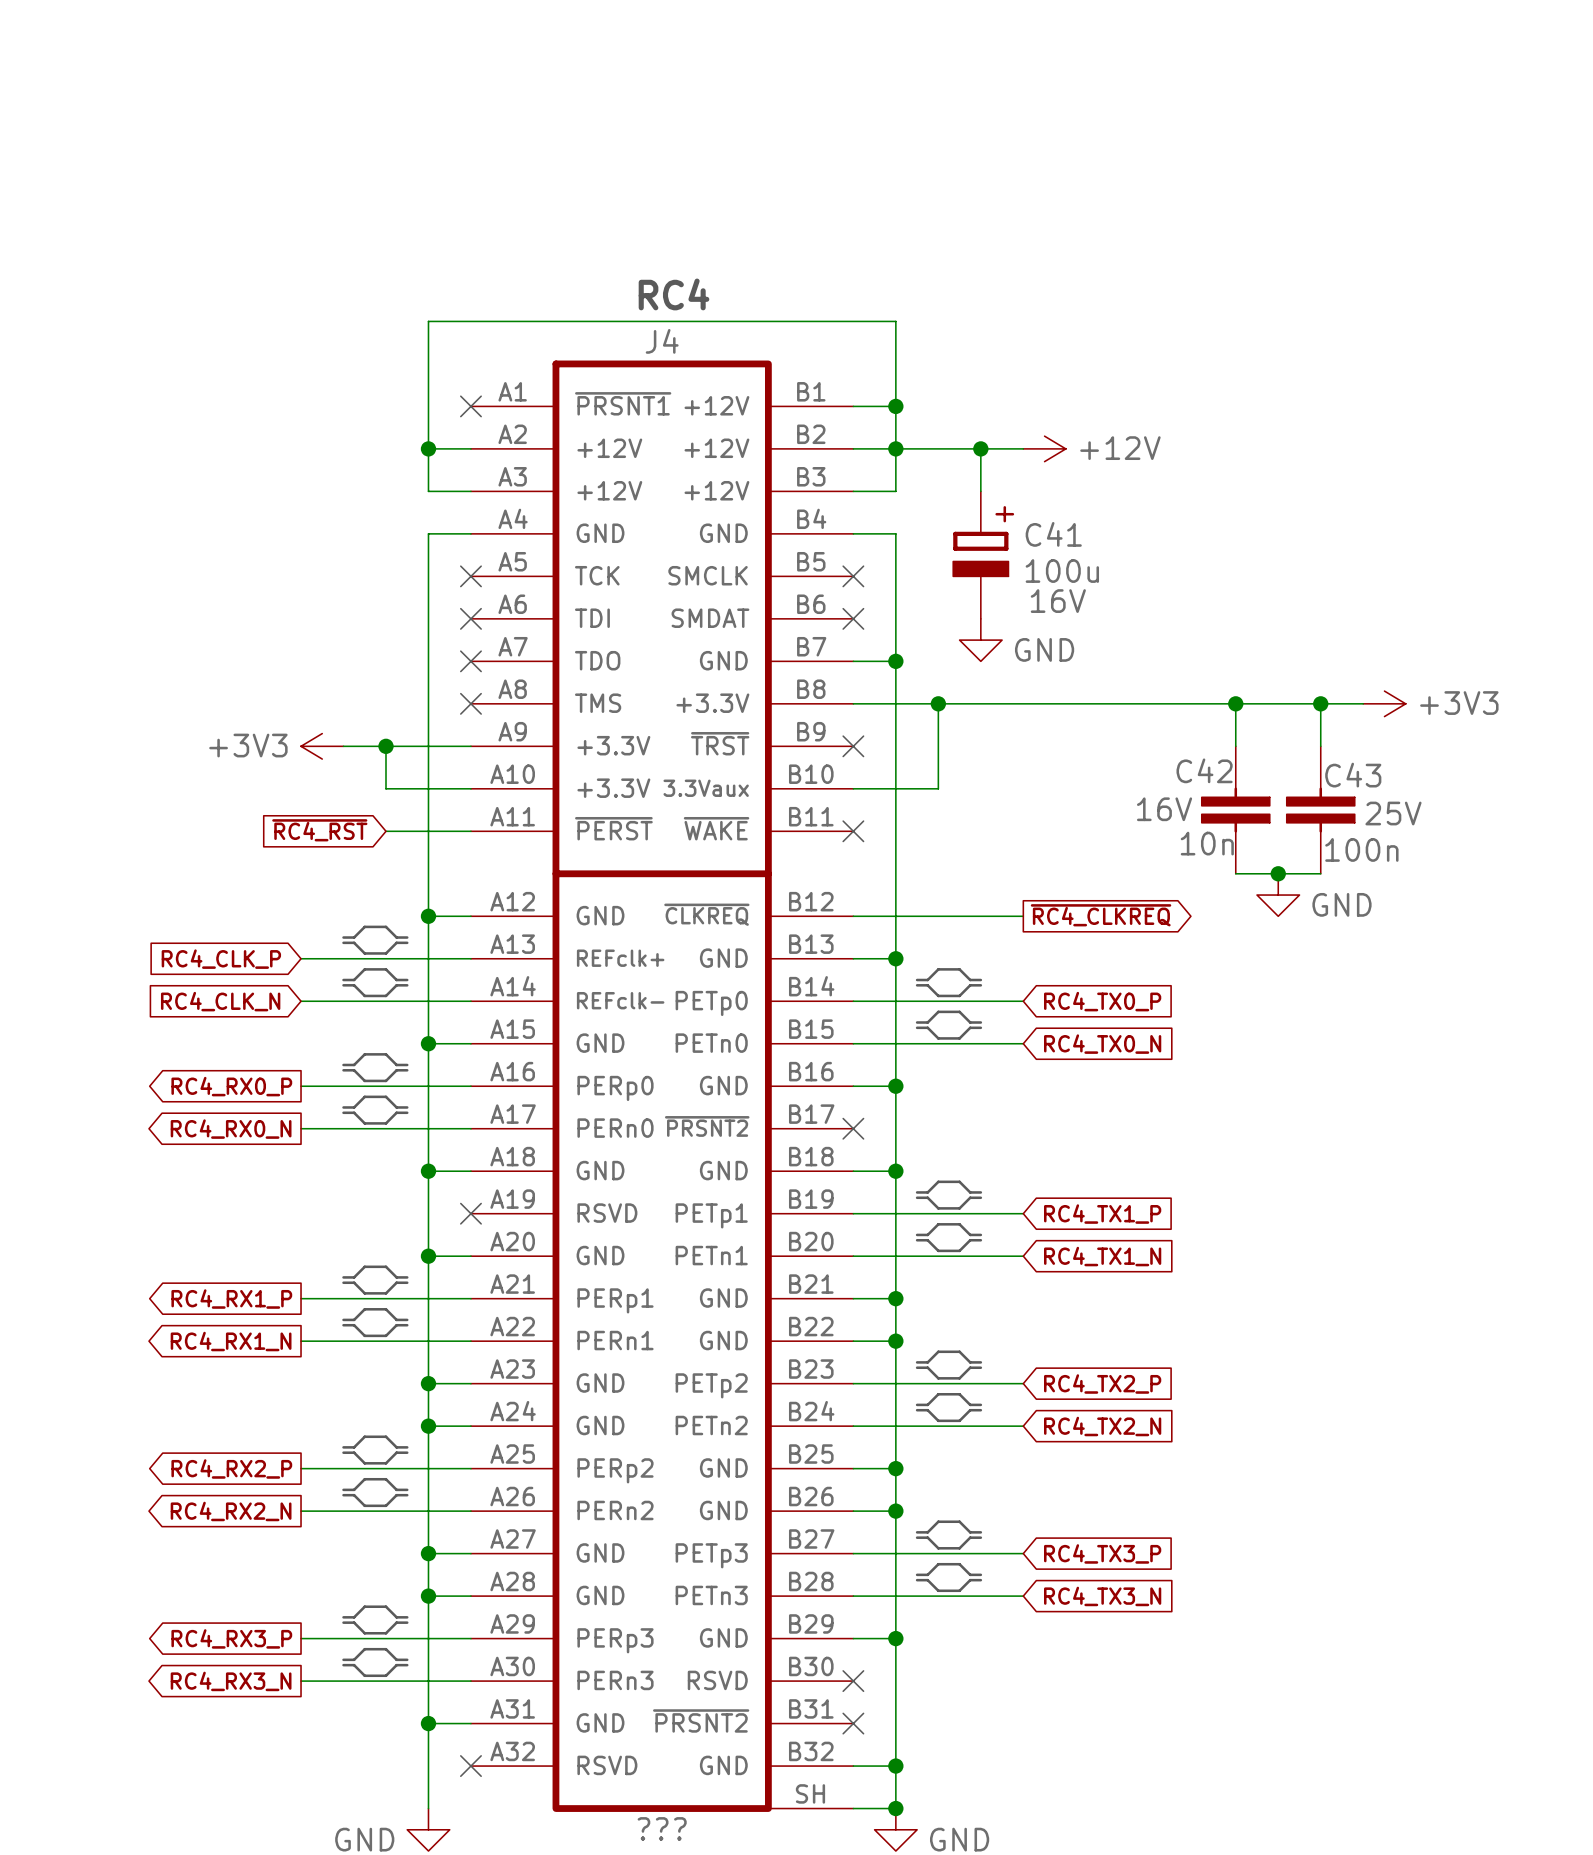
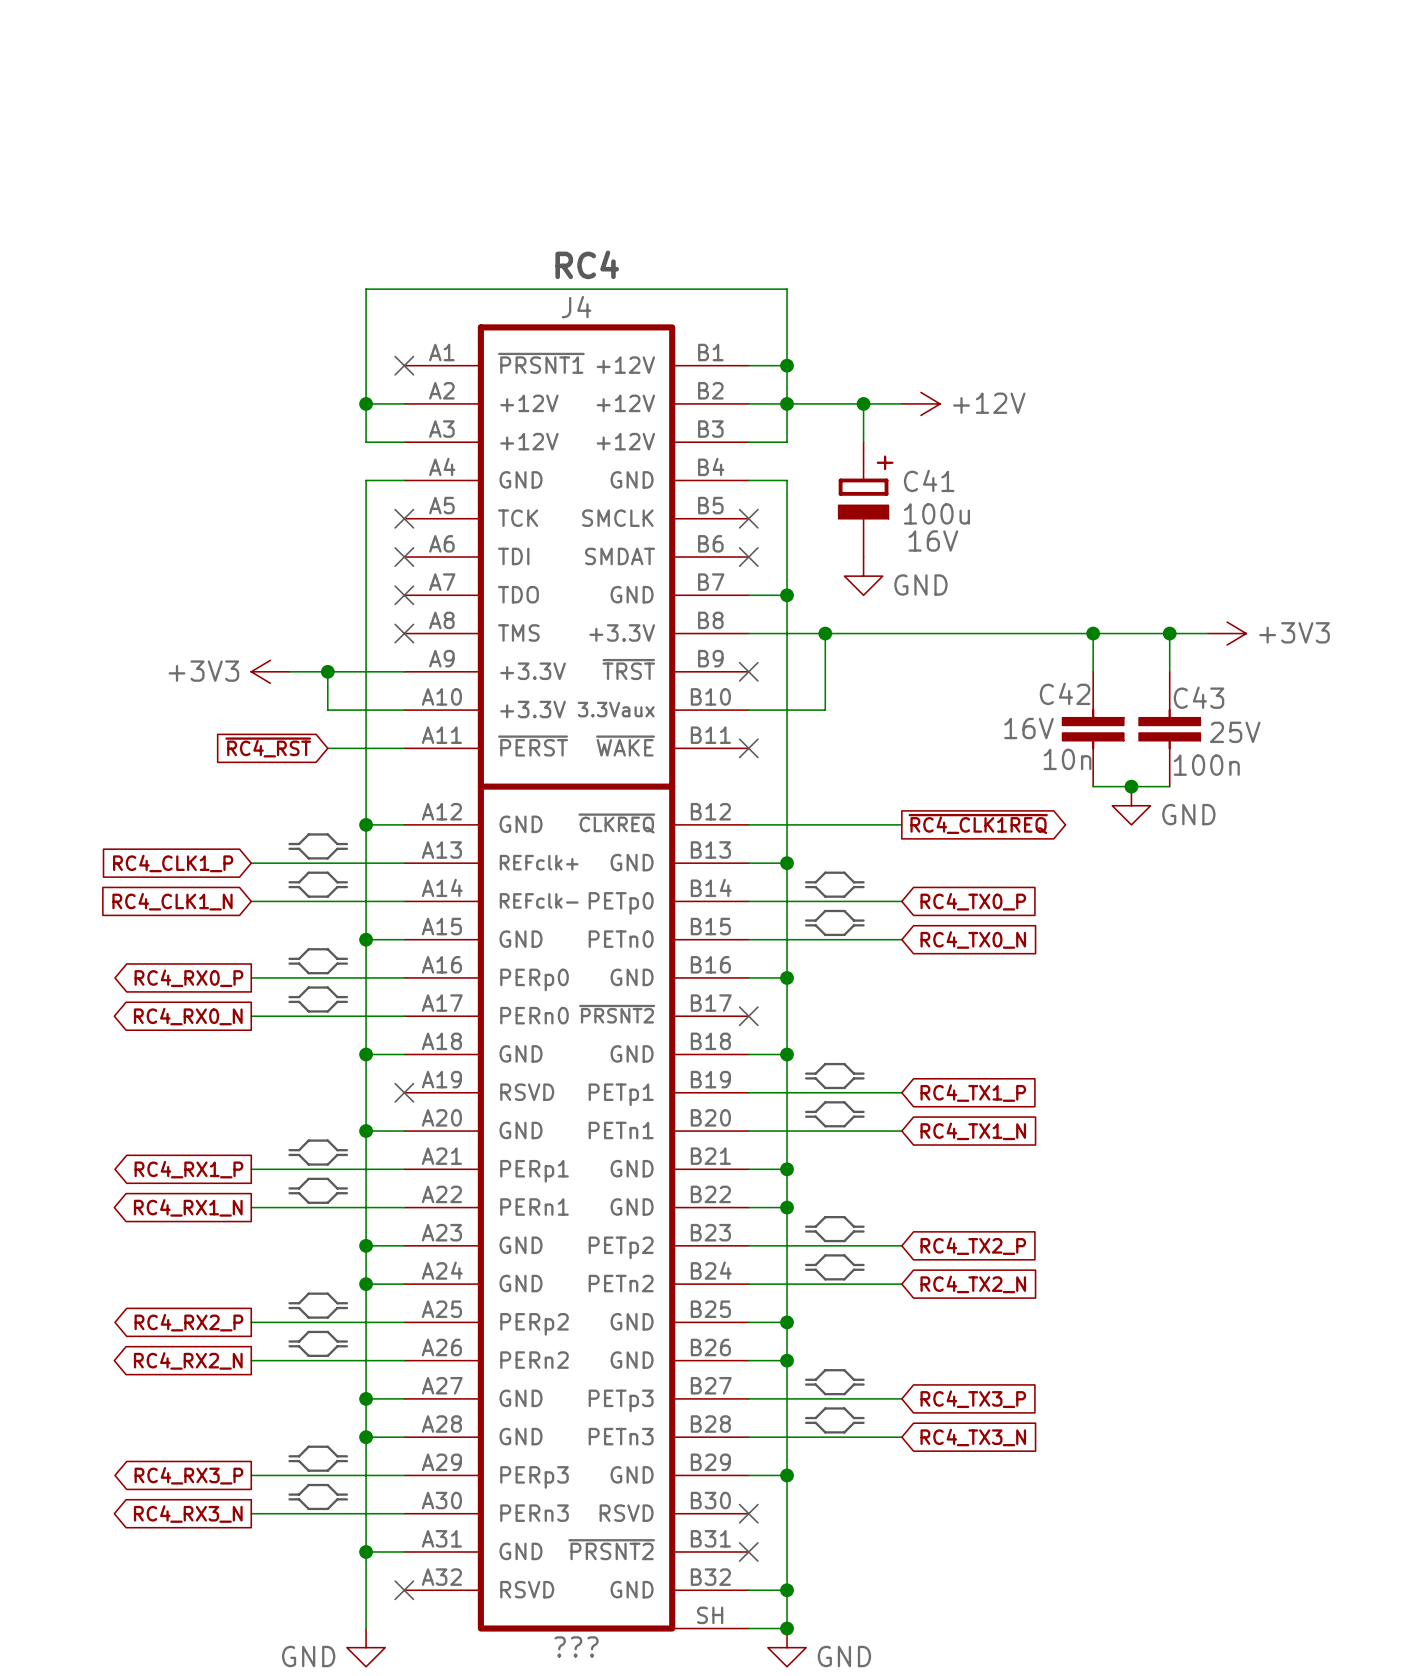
global label: ~{RC4_CLKREQ} (1101, 915) -> ~{RC4_CLK1REQ} (978, 823)
global label: RC4_CLK_P (221, 959) -> RC4_CLK1_P (173, 863)
global label: RC4_CLK_N (220, 1001) -> RC4_CLK1_N (172, 901)

